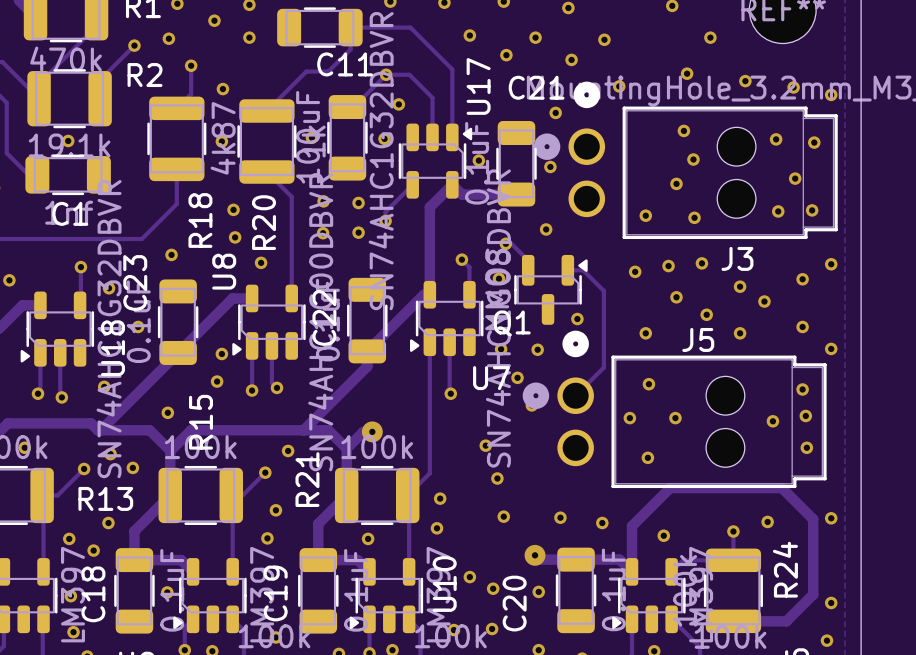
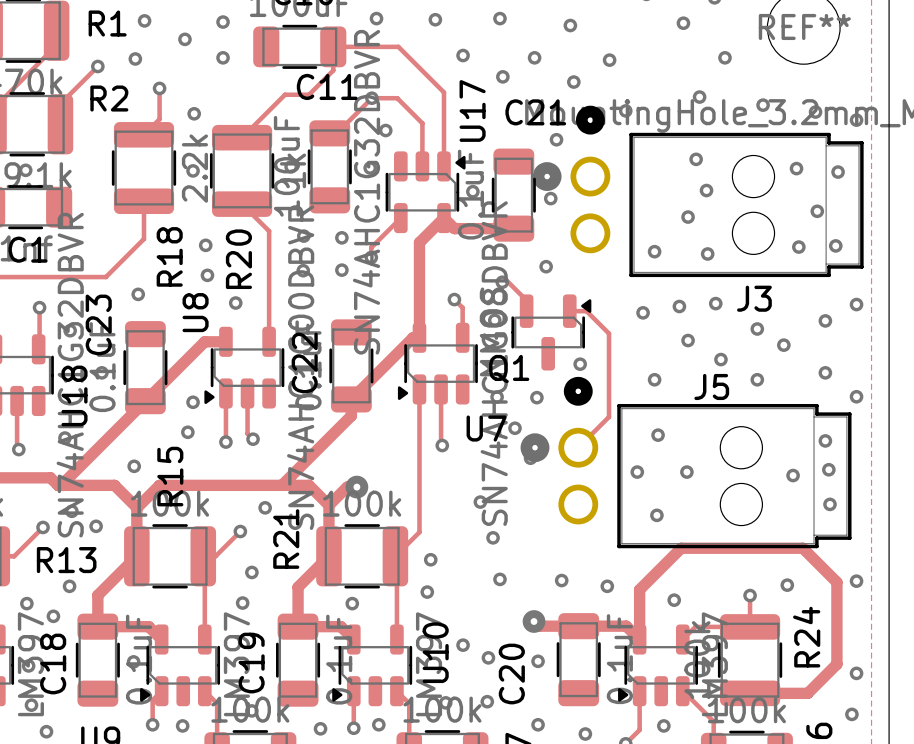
R18 value: 4k87 (223, 138) -> 2.2k (194, 168)

